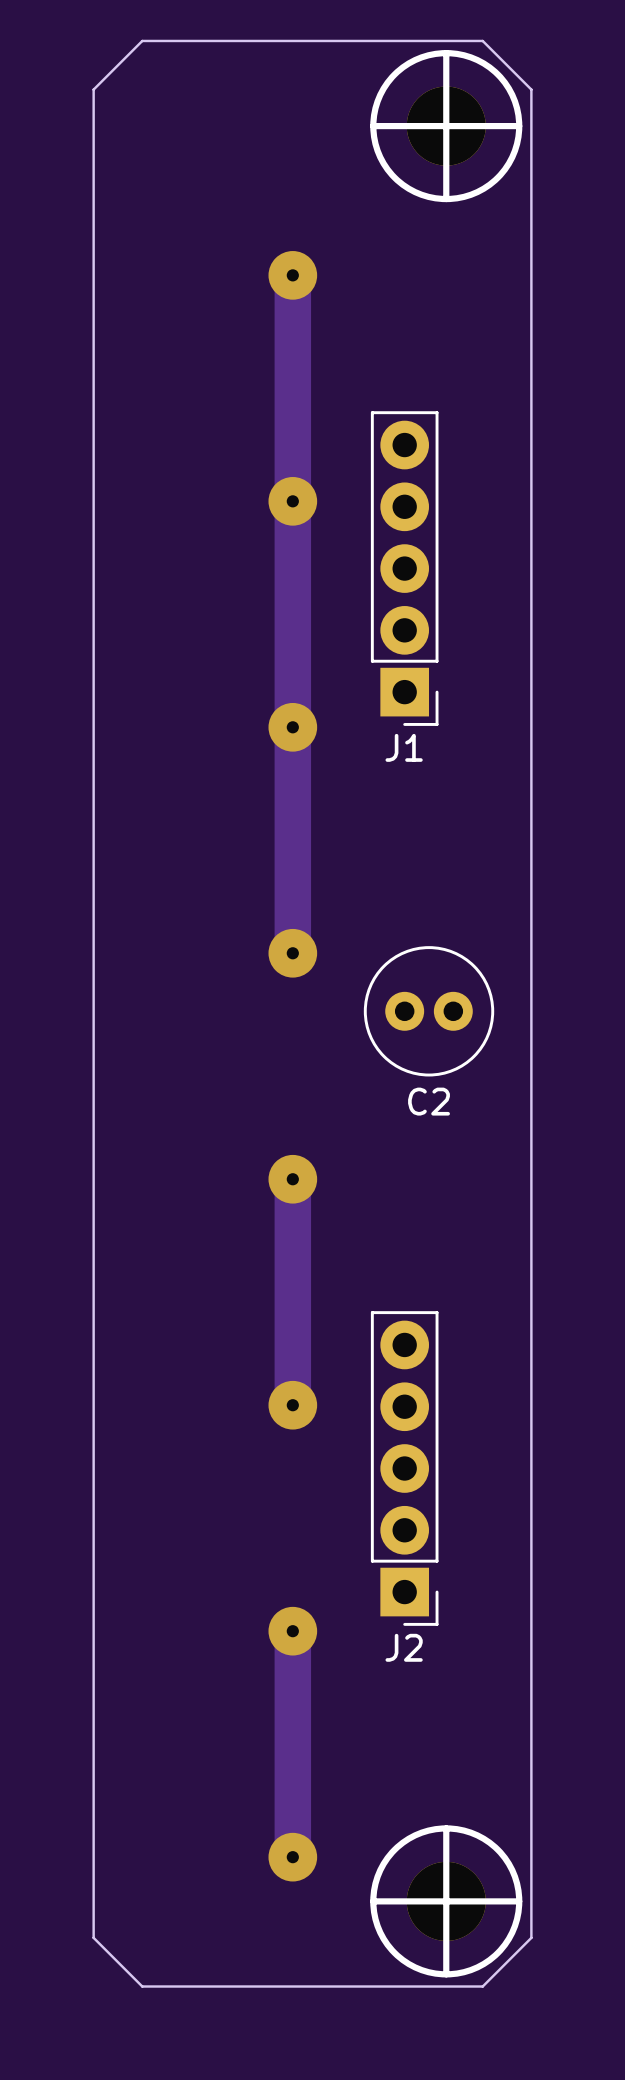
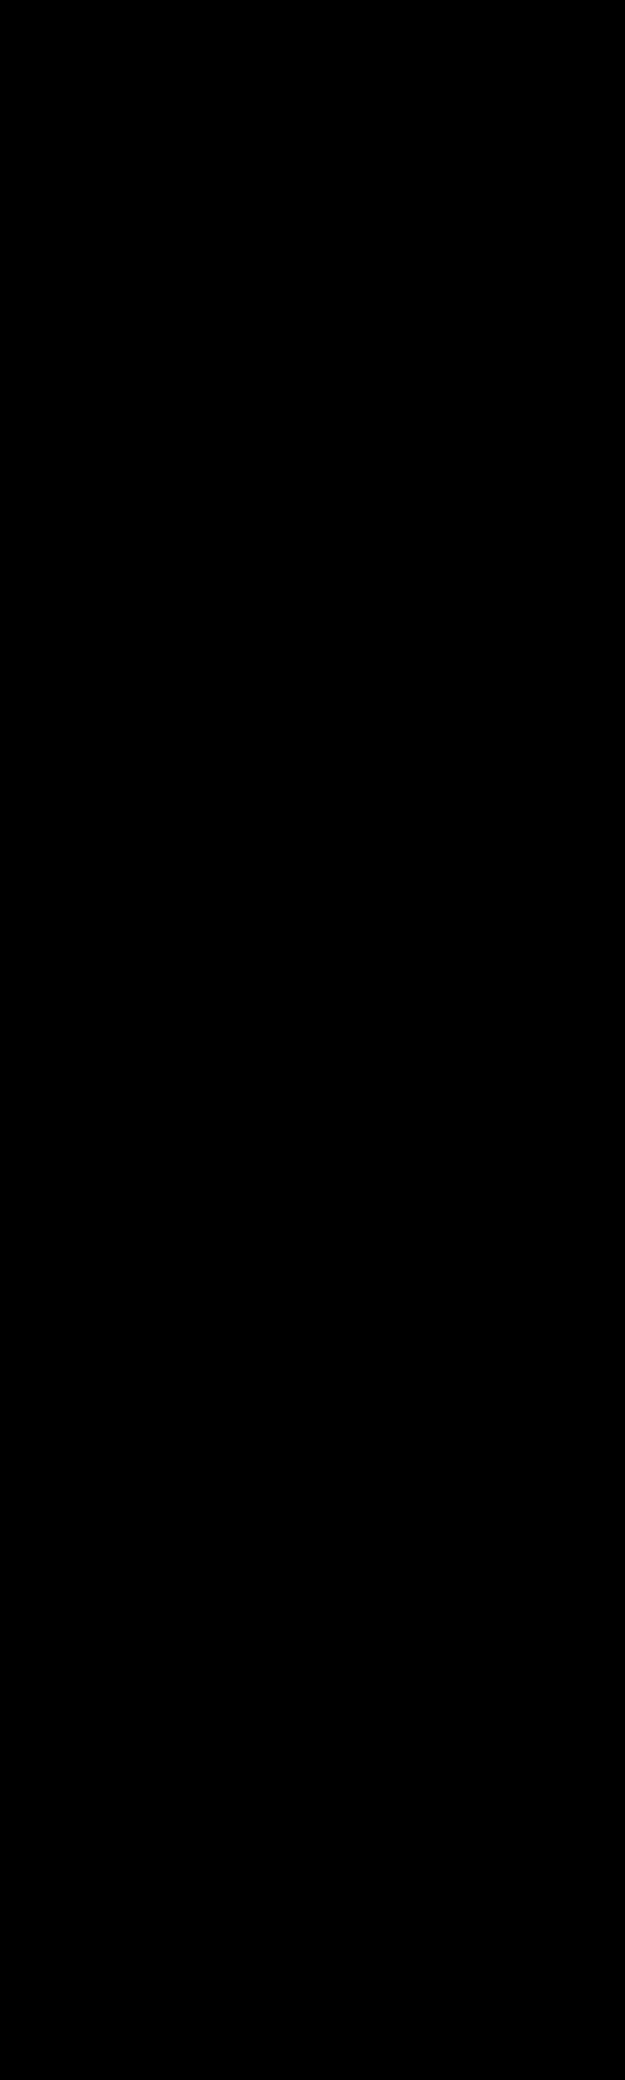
board edge: (142, 40) (482, 40) (531, 89) (531, 1937) (482, 1986) (142, 1986) (93, 1937) (93, 89) (142, 40) -> none
part: (446, 126) -> none
track: (292, 275) (292, 953) -> none
via: (292, 275) -> none
via: (292, 501) -> none
J1: (404, 568) -> none
via: (292, 727) -> none
via: (292, 953) -> none
C2: (429, 1011) -> none
track: (292, 1179) (292, 1405) -> none
via: (292, 1179) -> none
via: (292, 1405) -> none
J2: (404, 1468) -> none
track: (292, 1631) (292, 1857) -> none
via: (292, 1631) -> none
via: (292, 1857) -> none
part: (446, 1901) -> none

